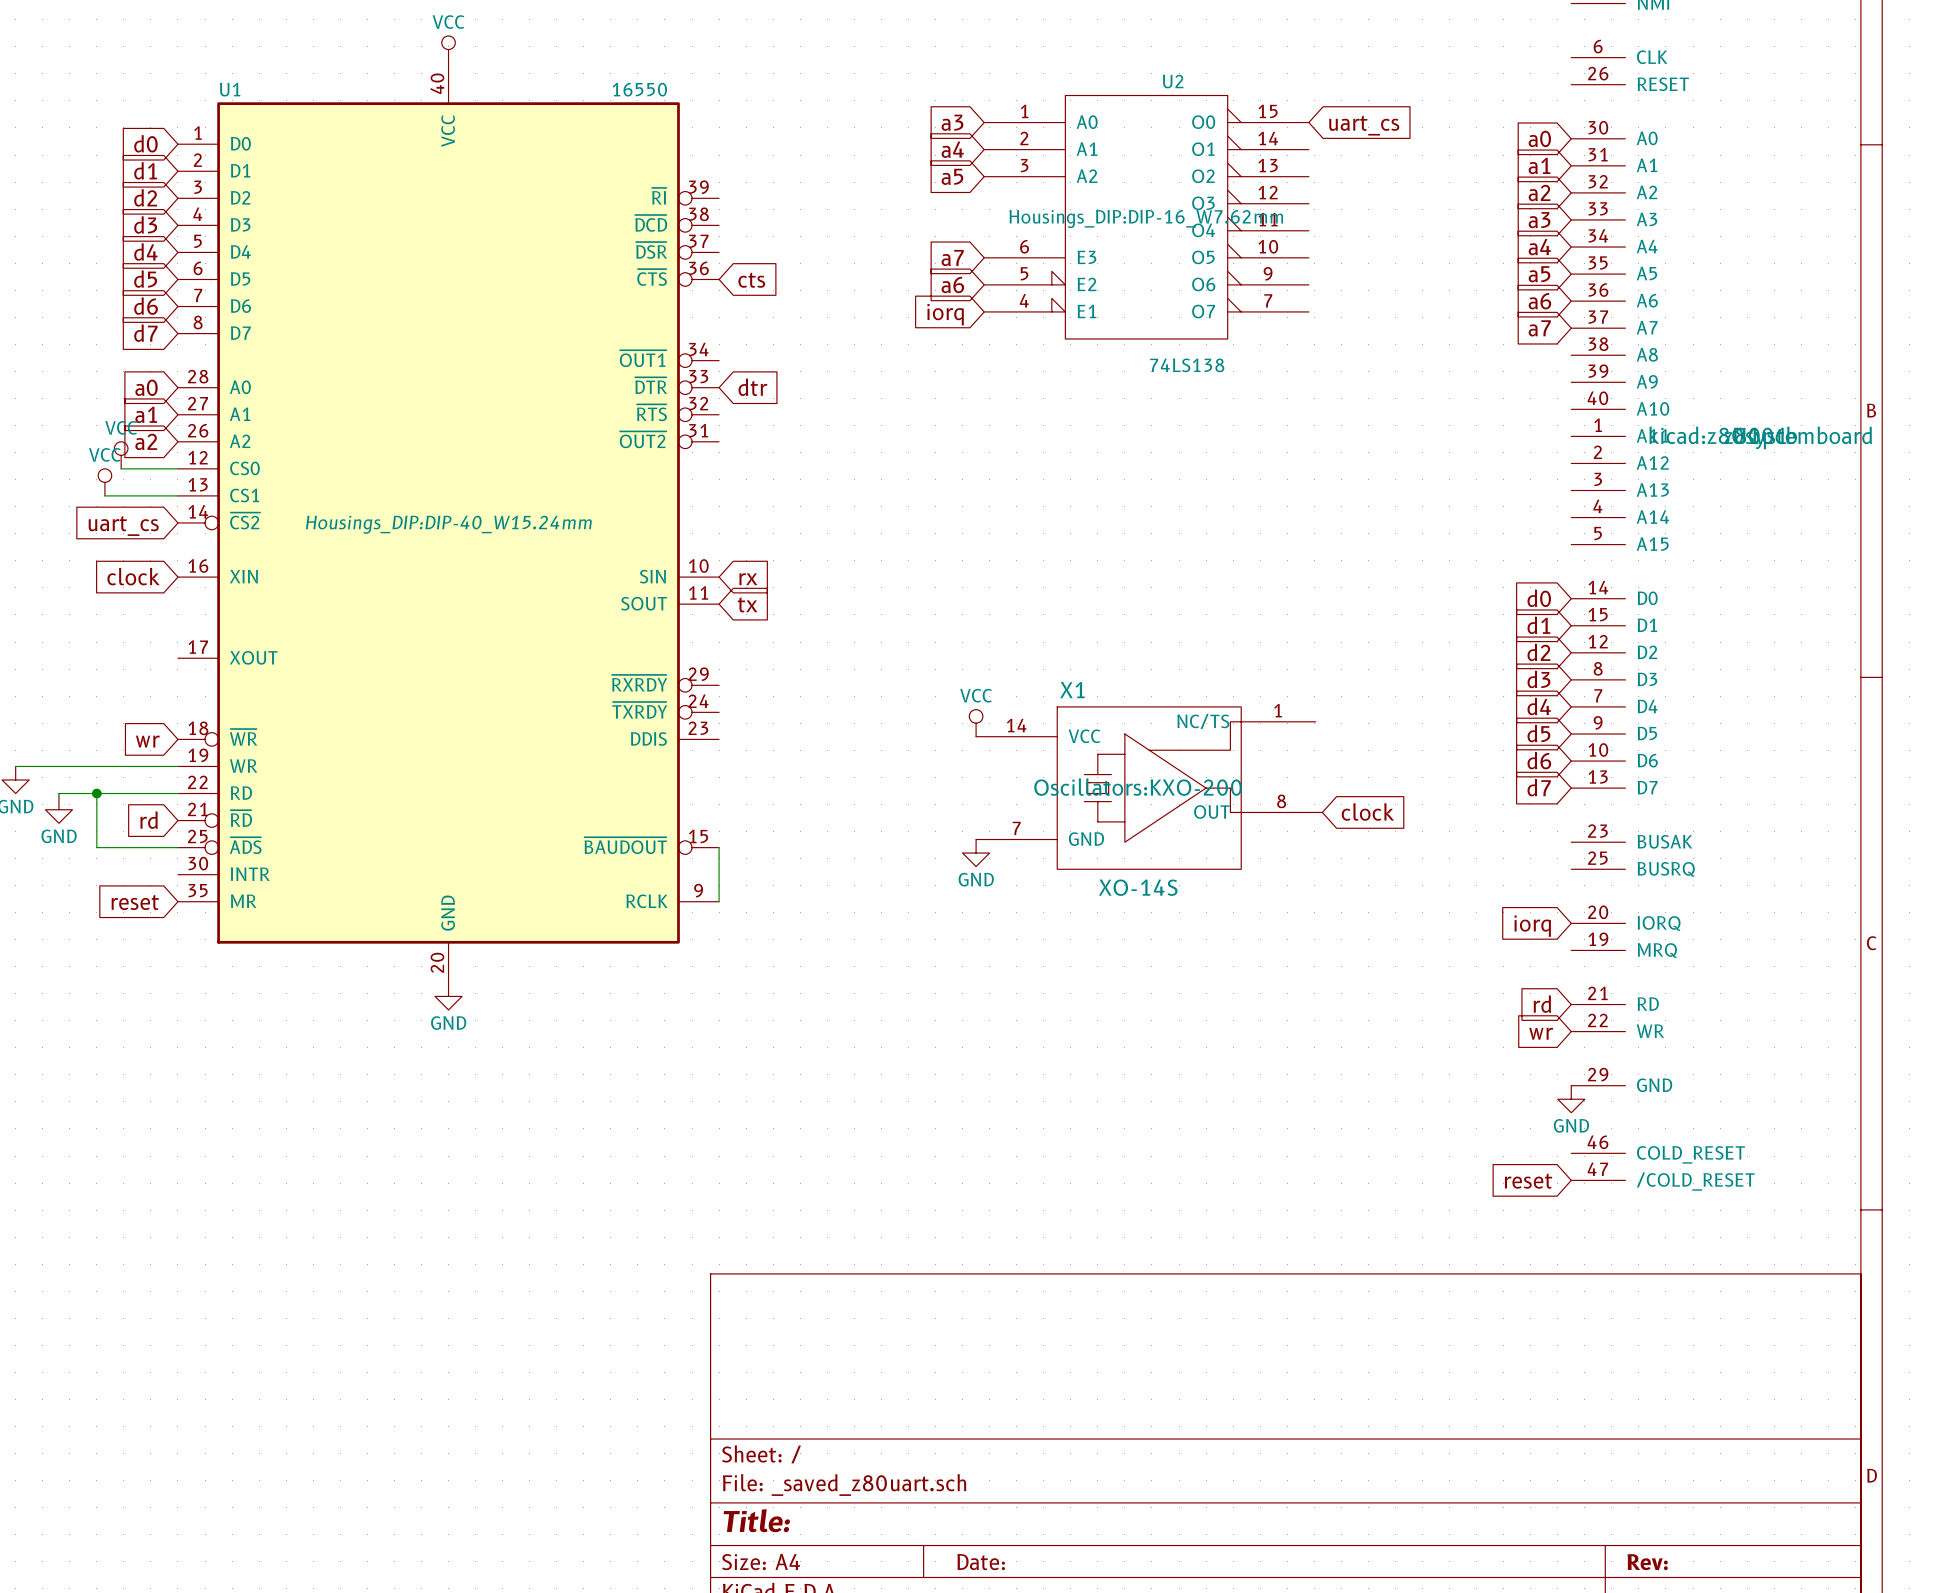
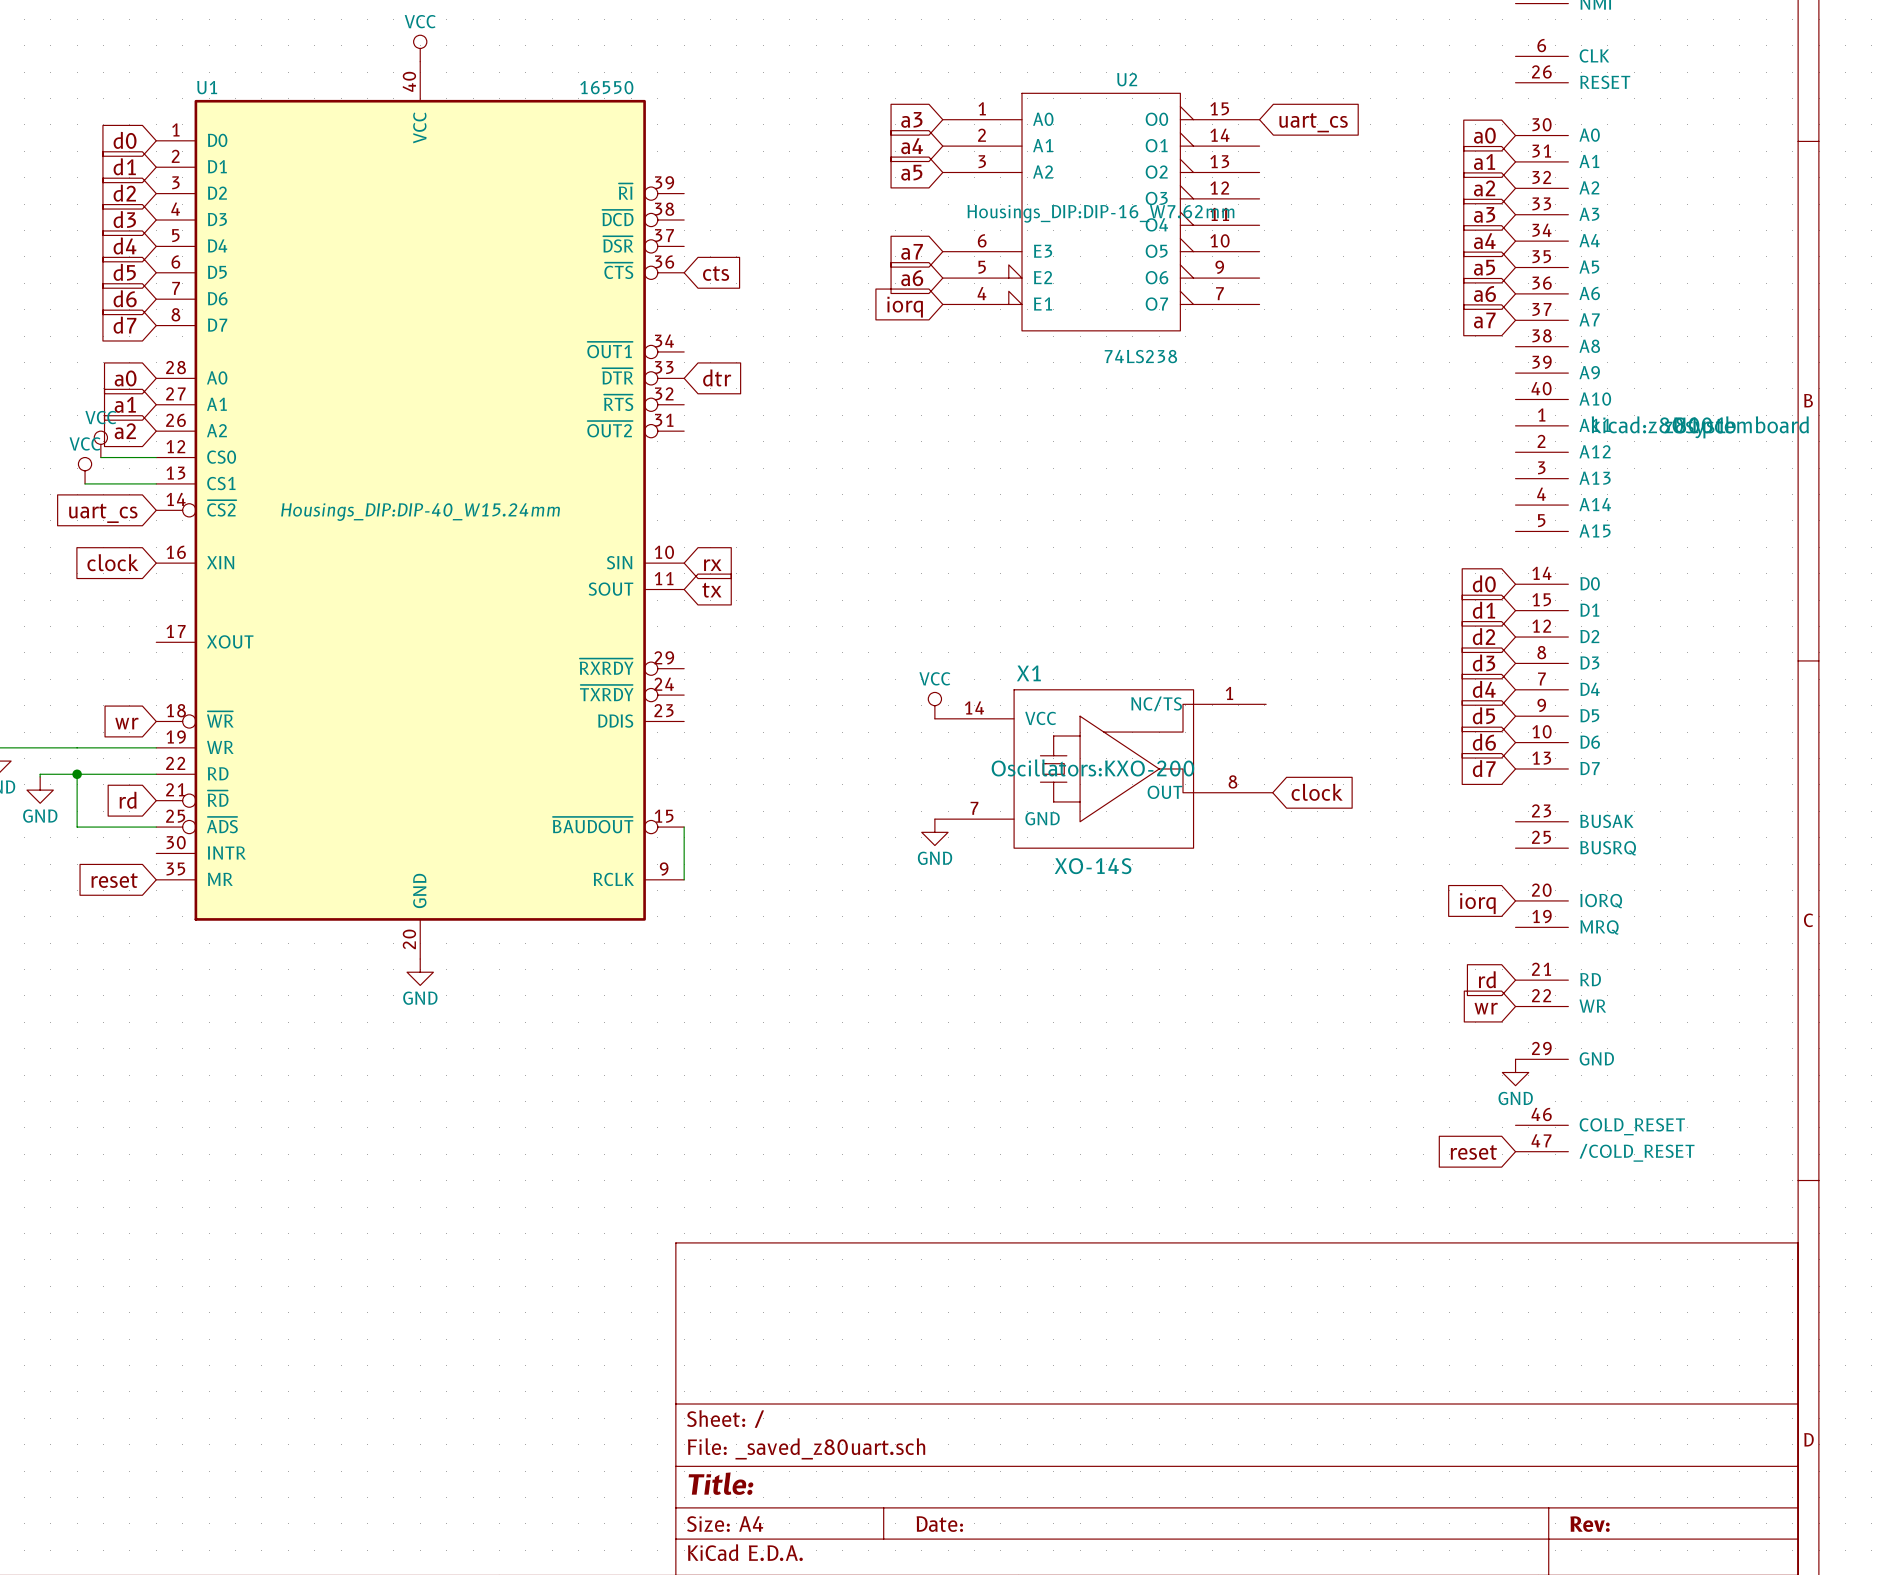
U2 value: 74LS138 (1187, 365) -> 74LS238 (1140, 356)

